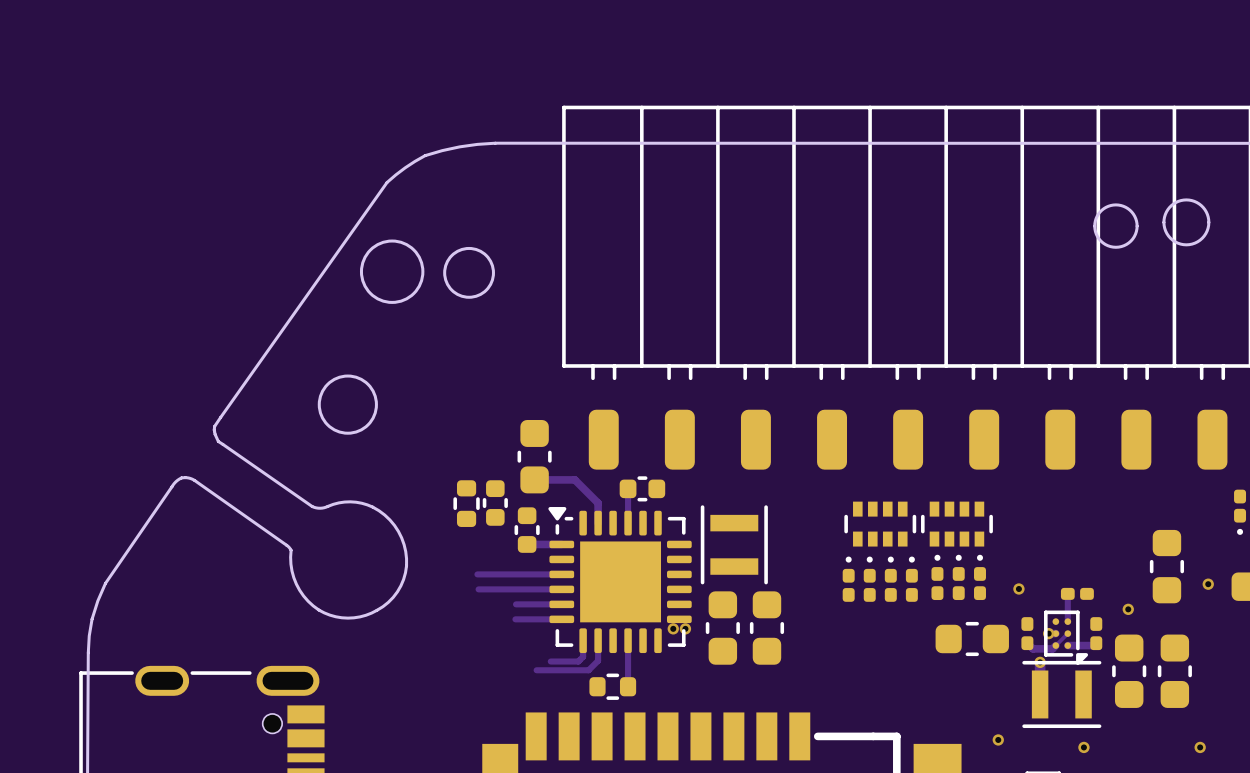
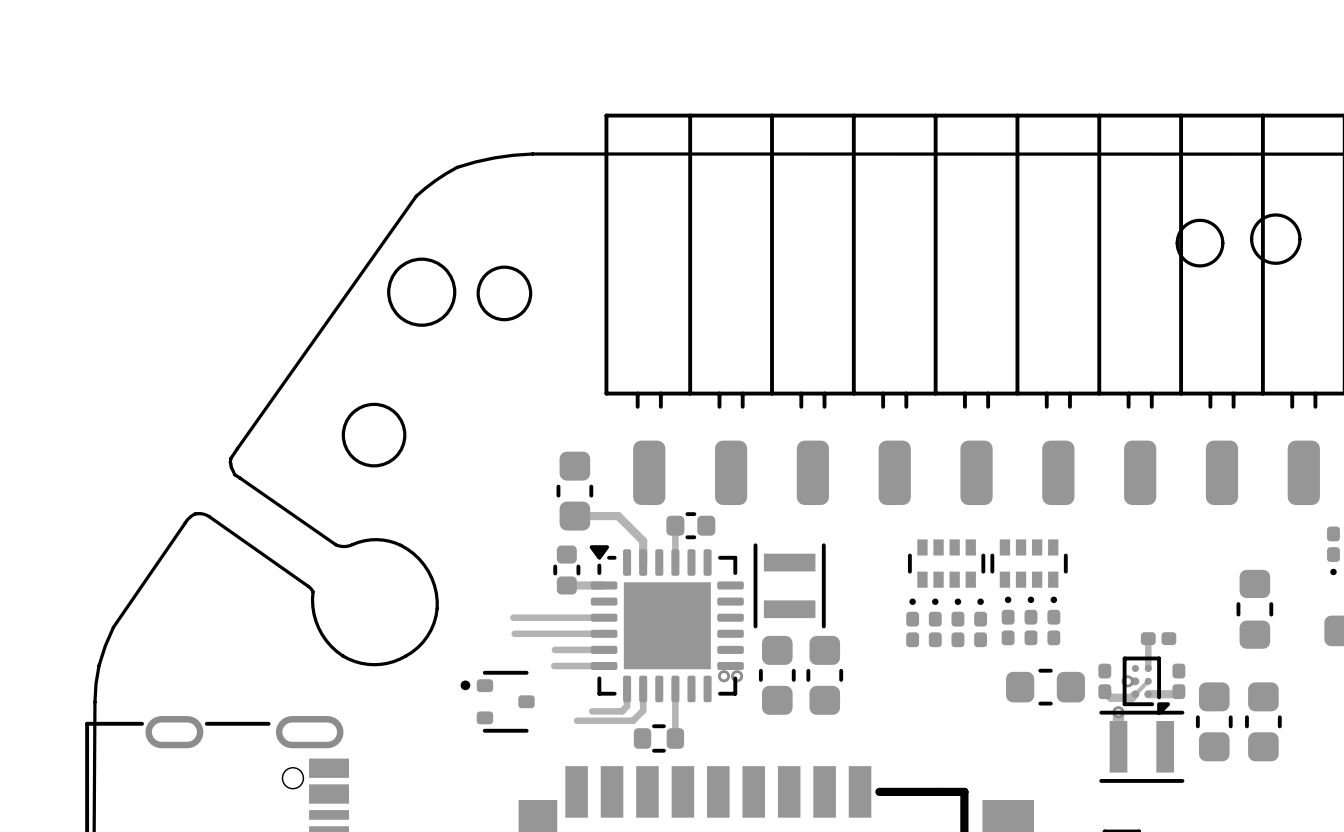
part: (466, 503) -> none
part: (495, 503) -> none
via: (1208, 584) -> none
via: (1018, 588) -> none
via: (1128, 609) -> none
part: none -> (497, 701)
via: (998, 739) -> none
via: (1083, 747) -> none
via: (1200, 747) -> none

